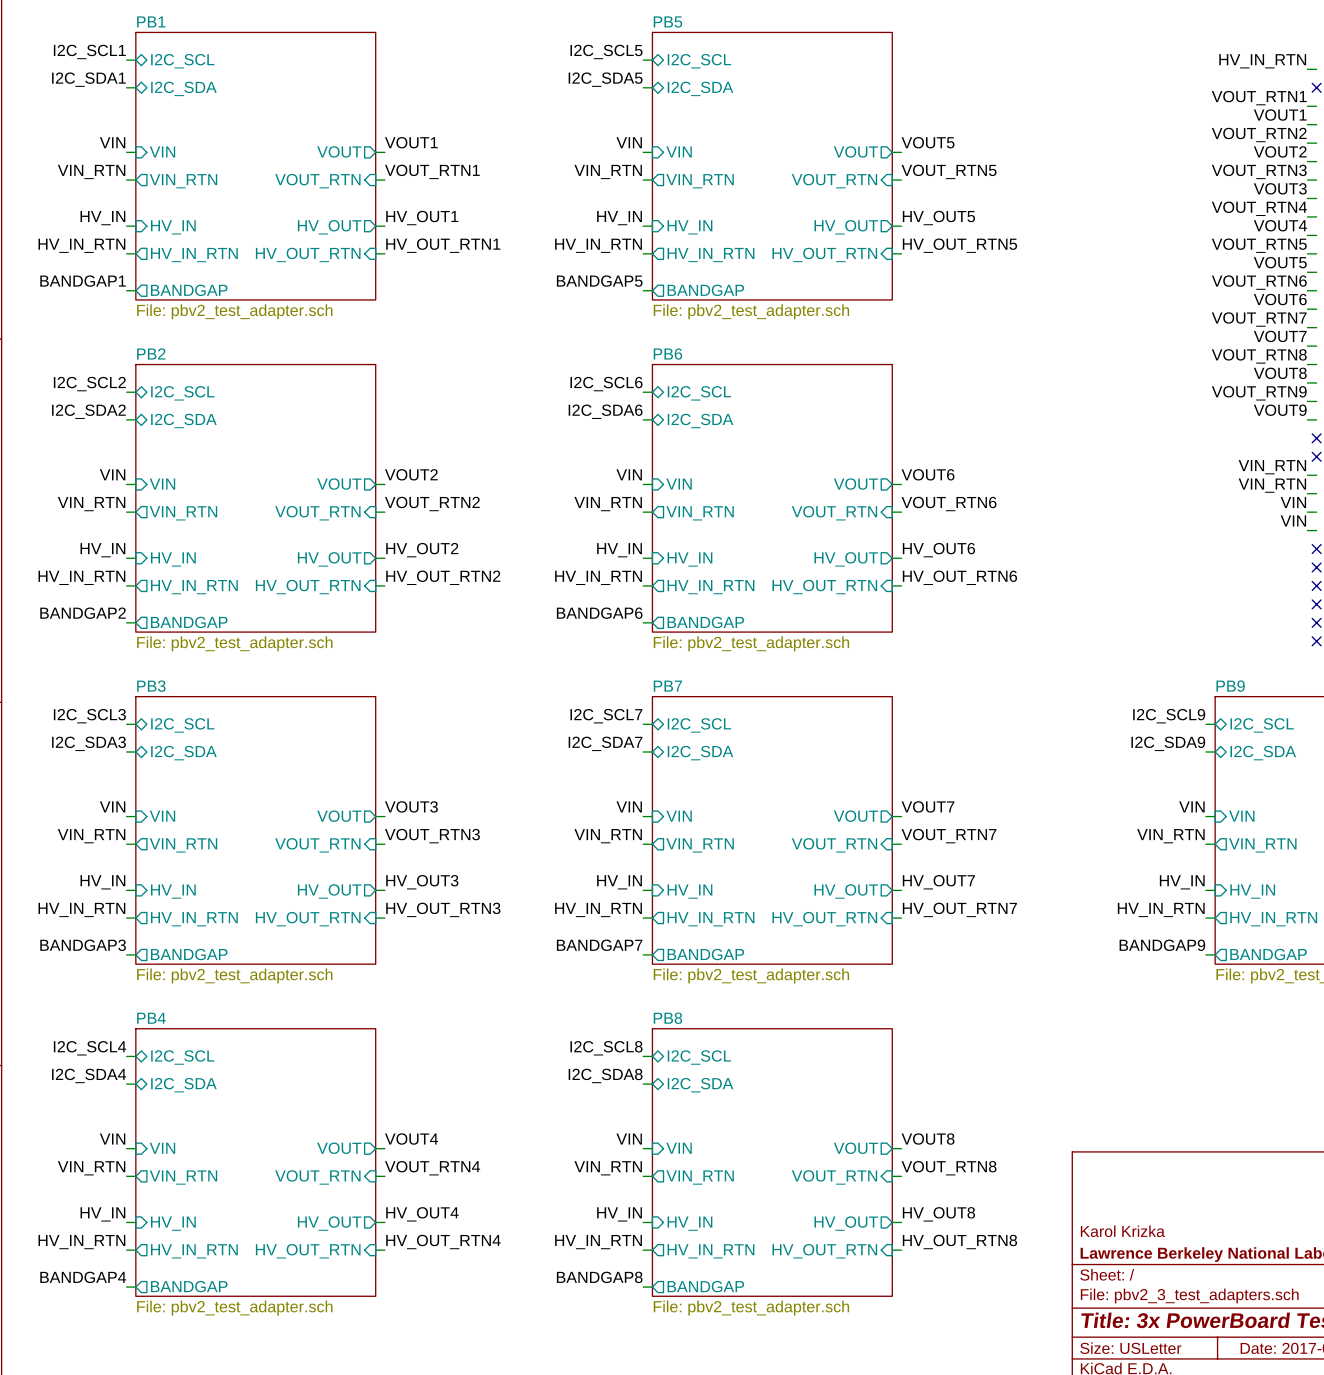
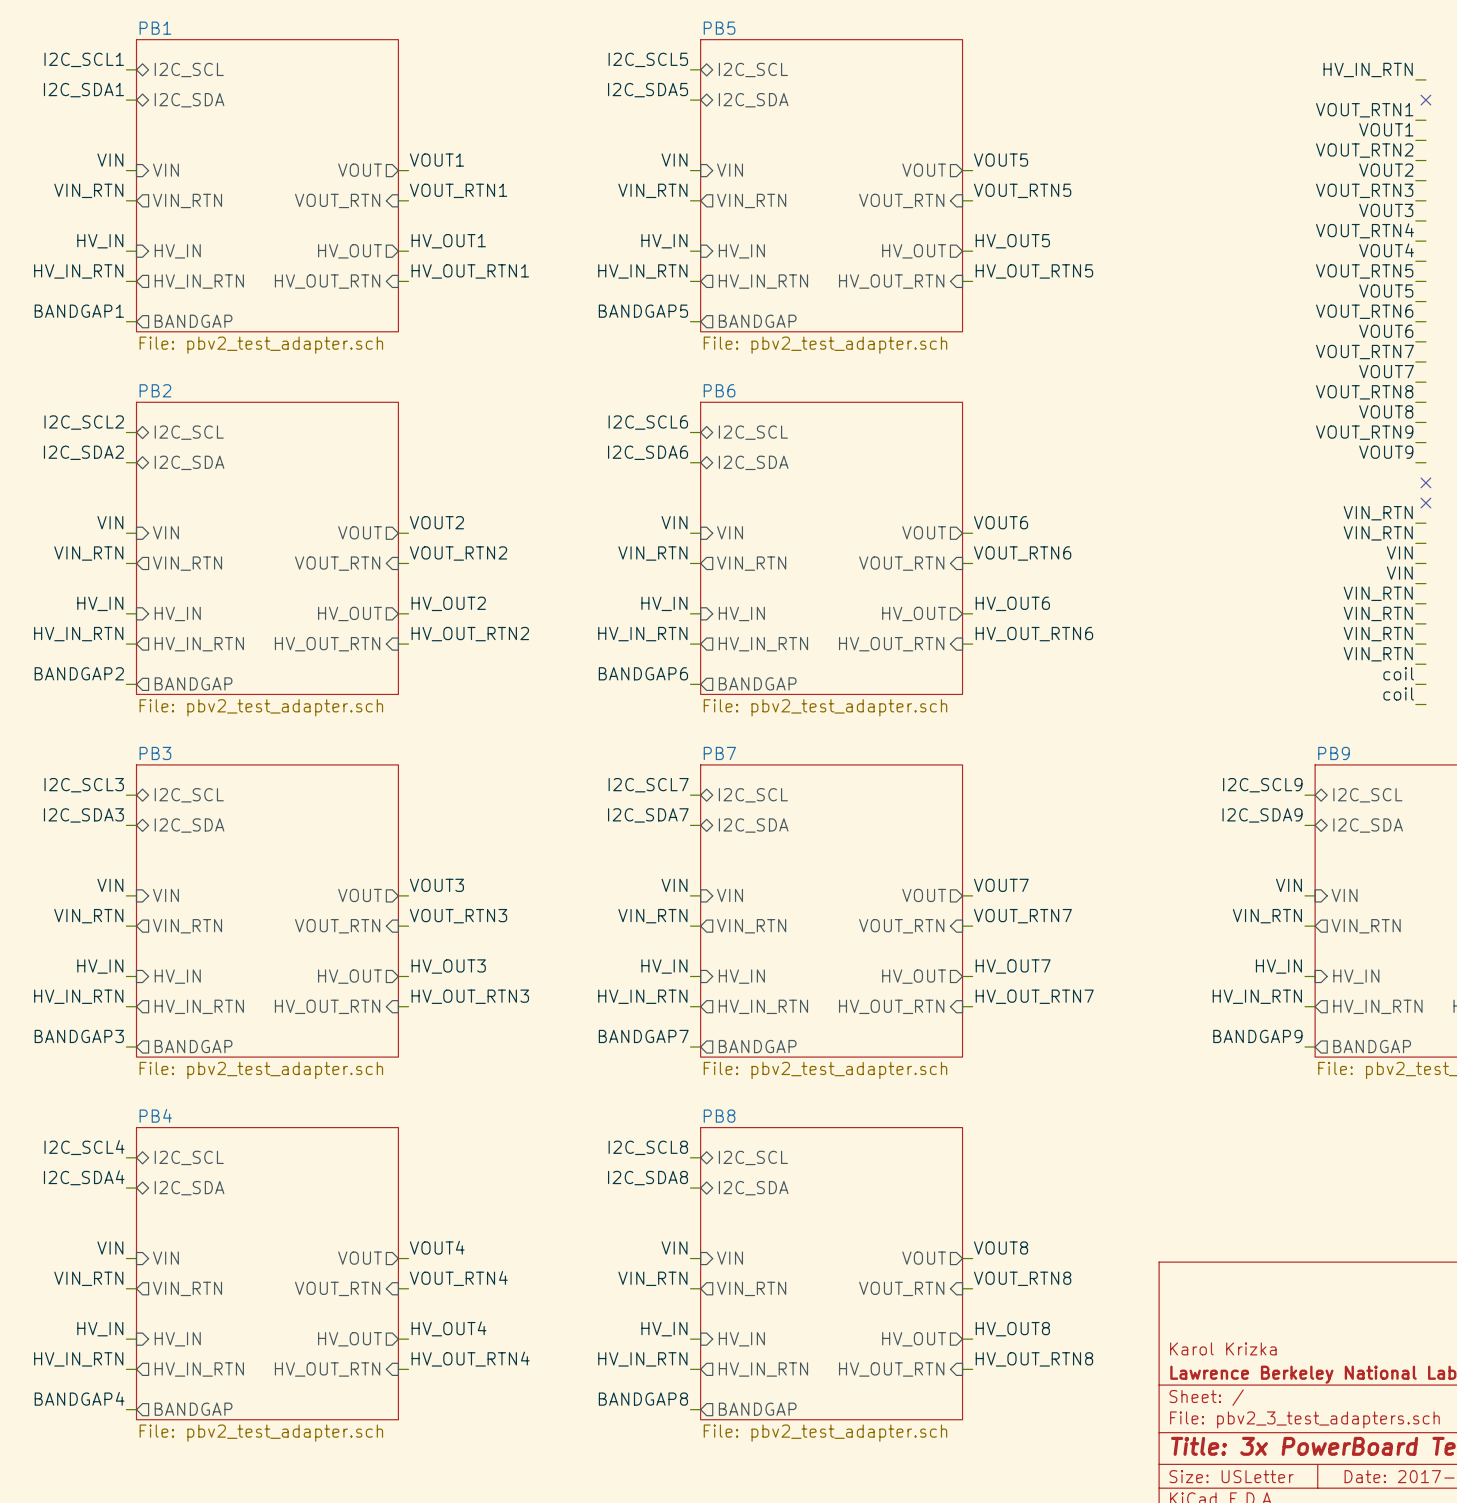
label: none -> VIN_RTN (1378, 593)
wire: none -> (1415, 603) (1425, 603)
no-connect mark: (1316, 549) -> none
label: none -> VIN_RTN (1378, 613)
wire: none -> (1415, 623) (1425, 623)
no-connect mark: (1316, 567) -> none
label: none -> VIN_RTN (1378, 634)
wire: none -> (1415, 644) (1425, 644)
no-connect mark: (1316, 585) -> none
label: none -> VIN_RTN (1378, 654)
wire: none -> (1415, 664) (1425, 664)
no-connect mark: (1316, 604) -> none
label: none -> coil (1398, 673)
wire: none -> (1415, 684) (1425, 684)
no-connect mark: (1316, 622) -> none
label: none -> coil (1398, 693)
wire: none -> (1415, 704) (1425, 704)
no-connect mark: (1316, 641) -> none

